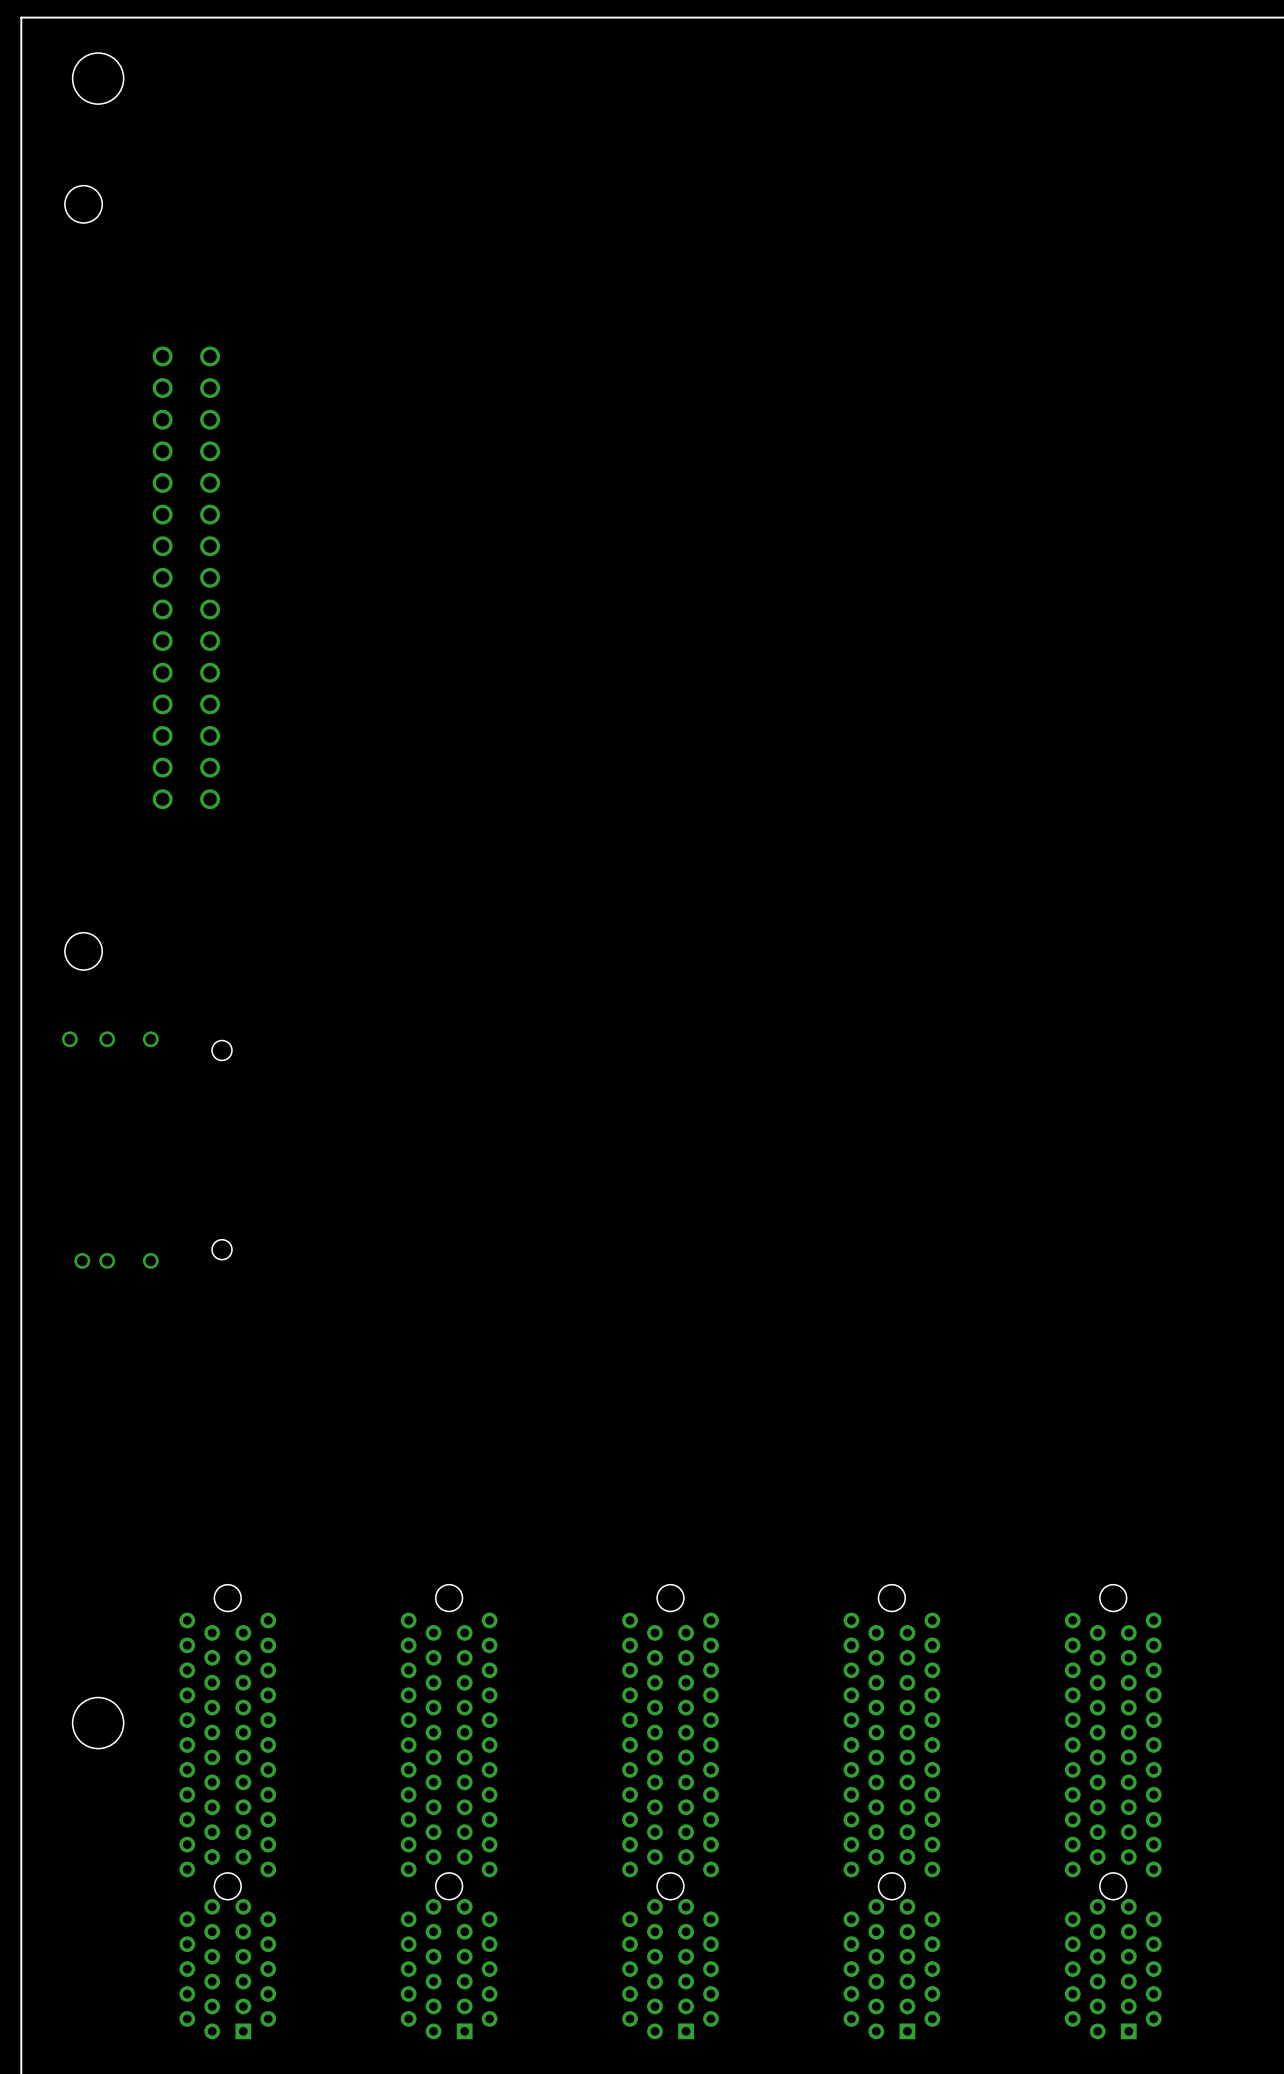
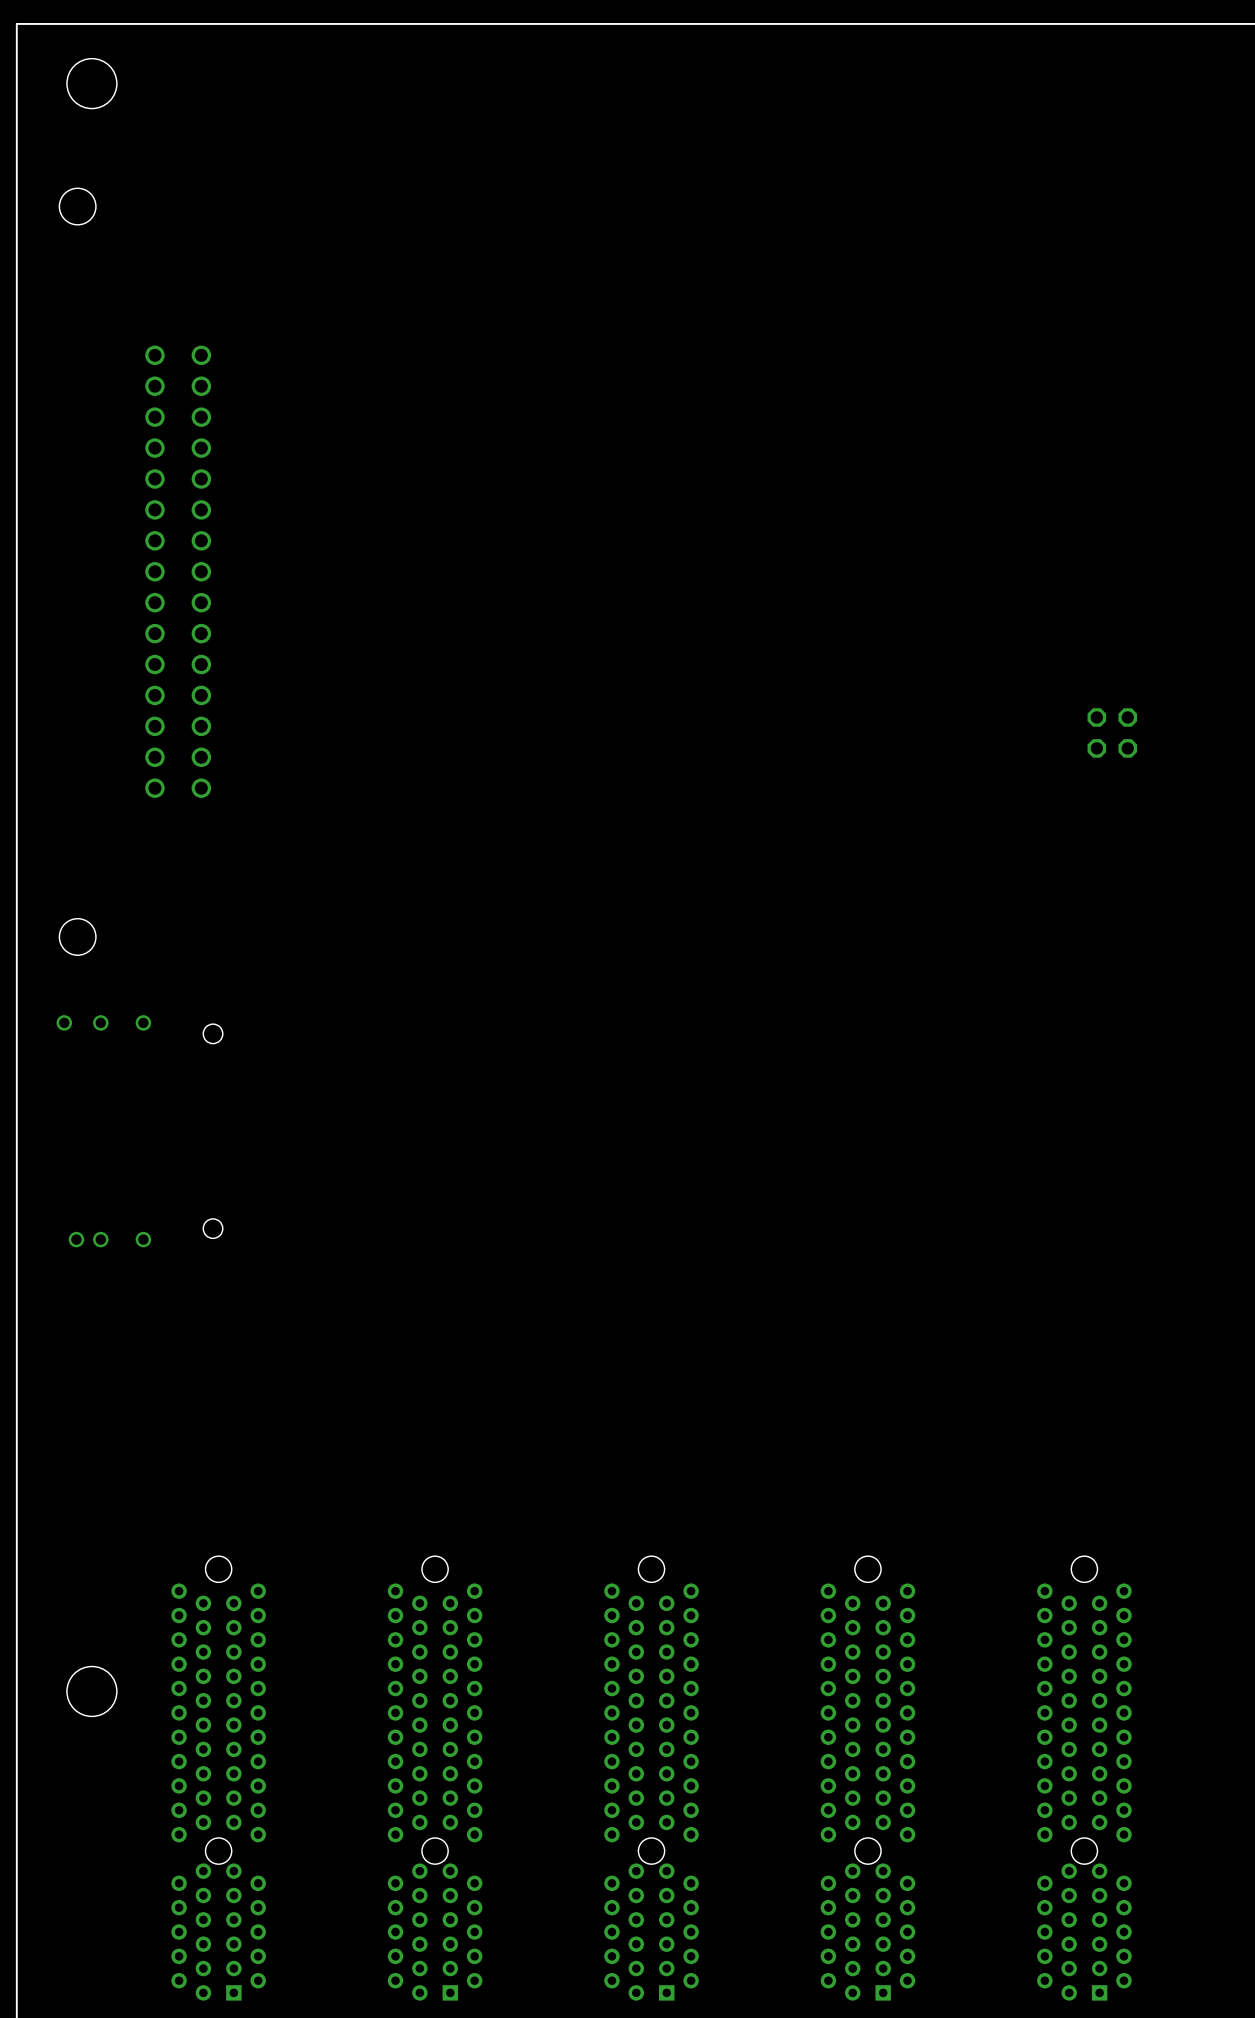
part: none -> (1112, 732)

